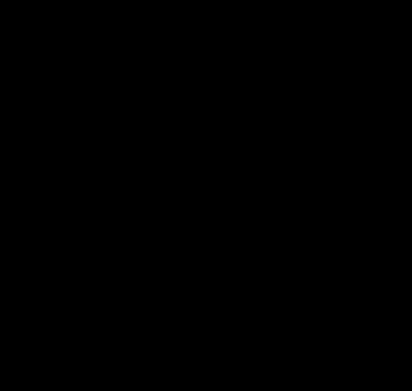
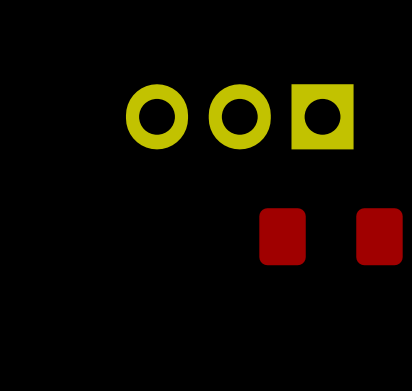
part: none -> (239, 116)
part: none -> (331, 236)

